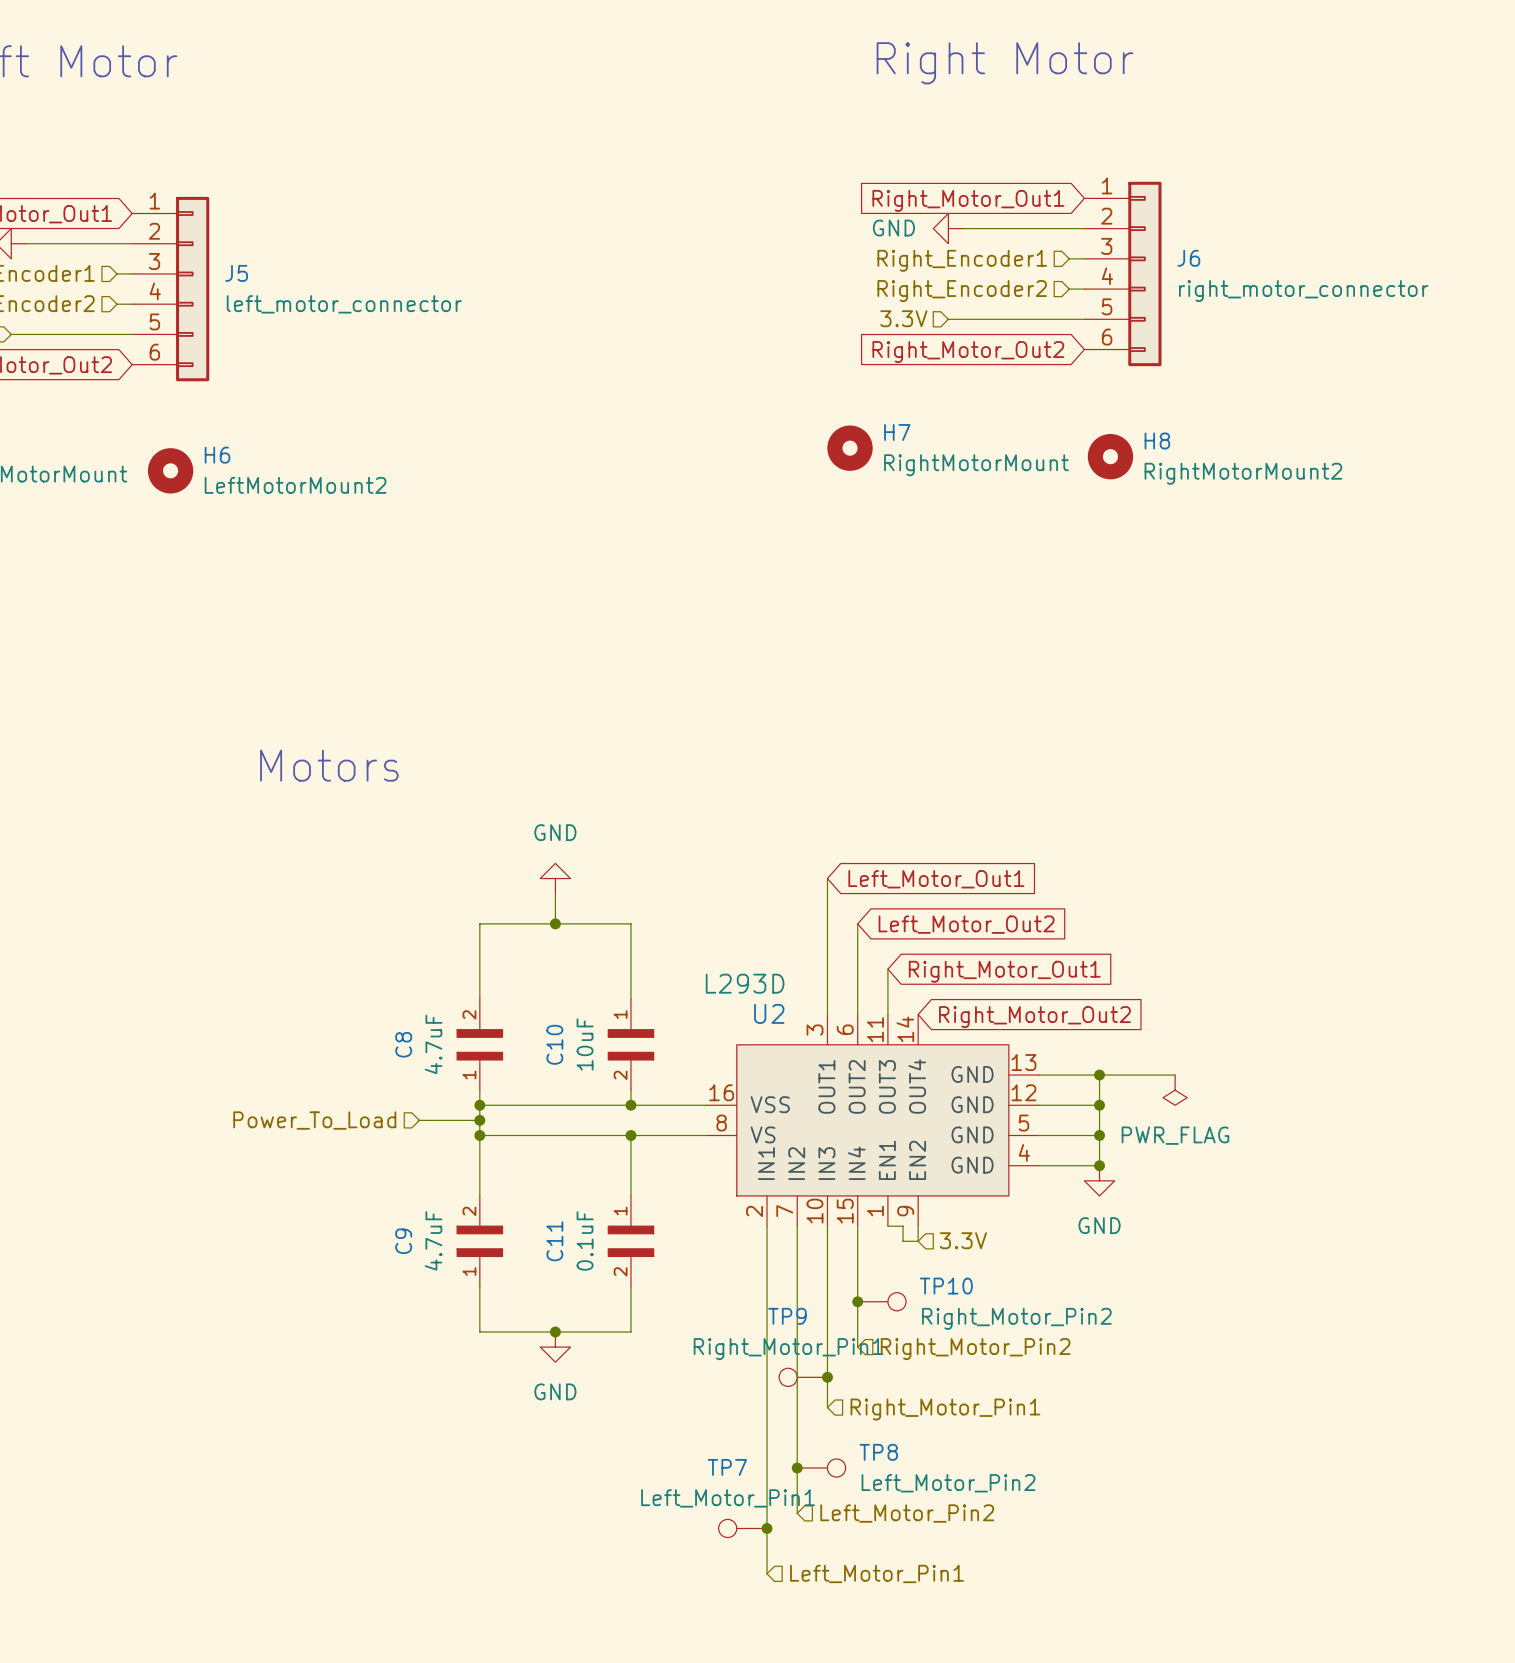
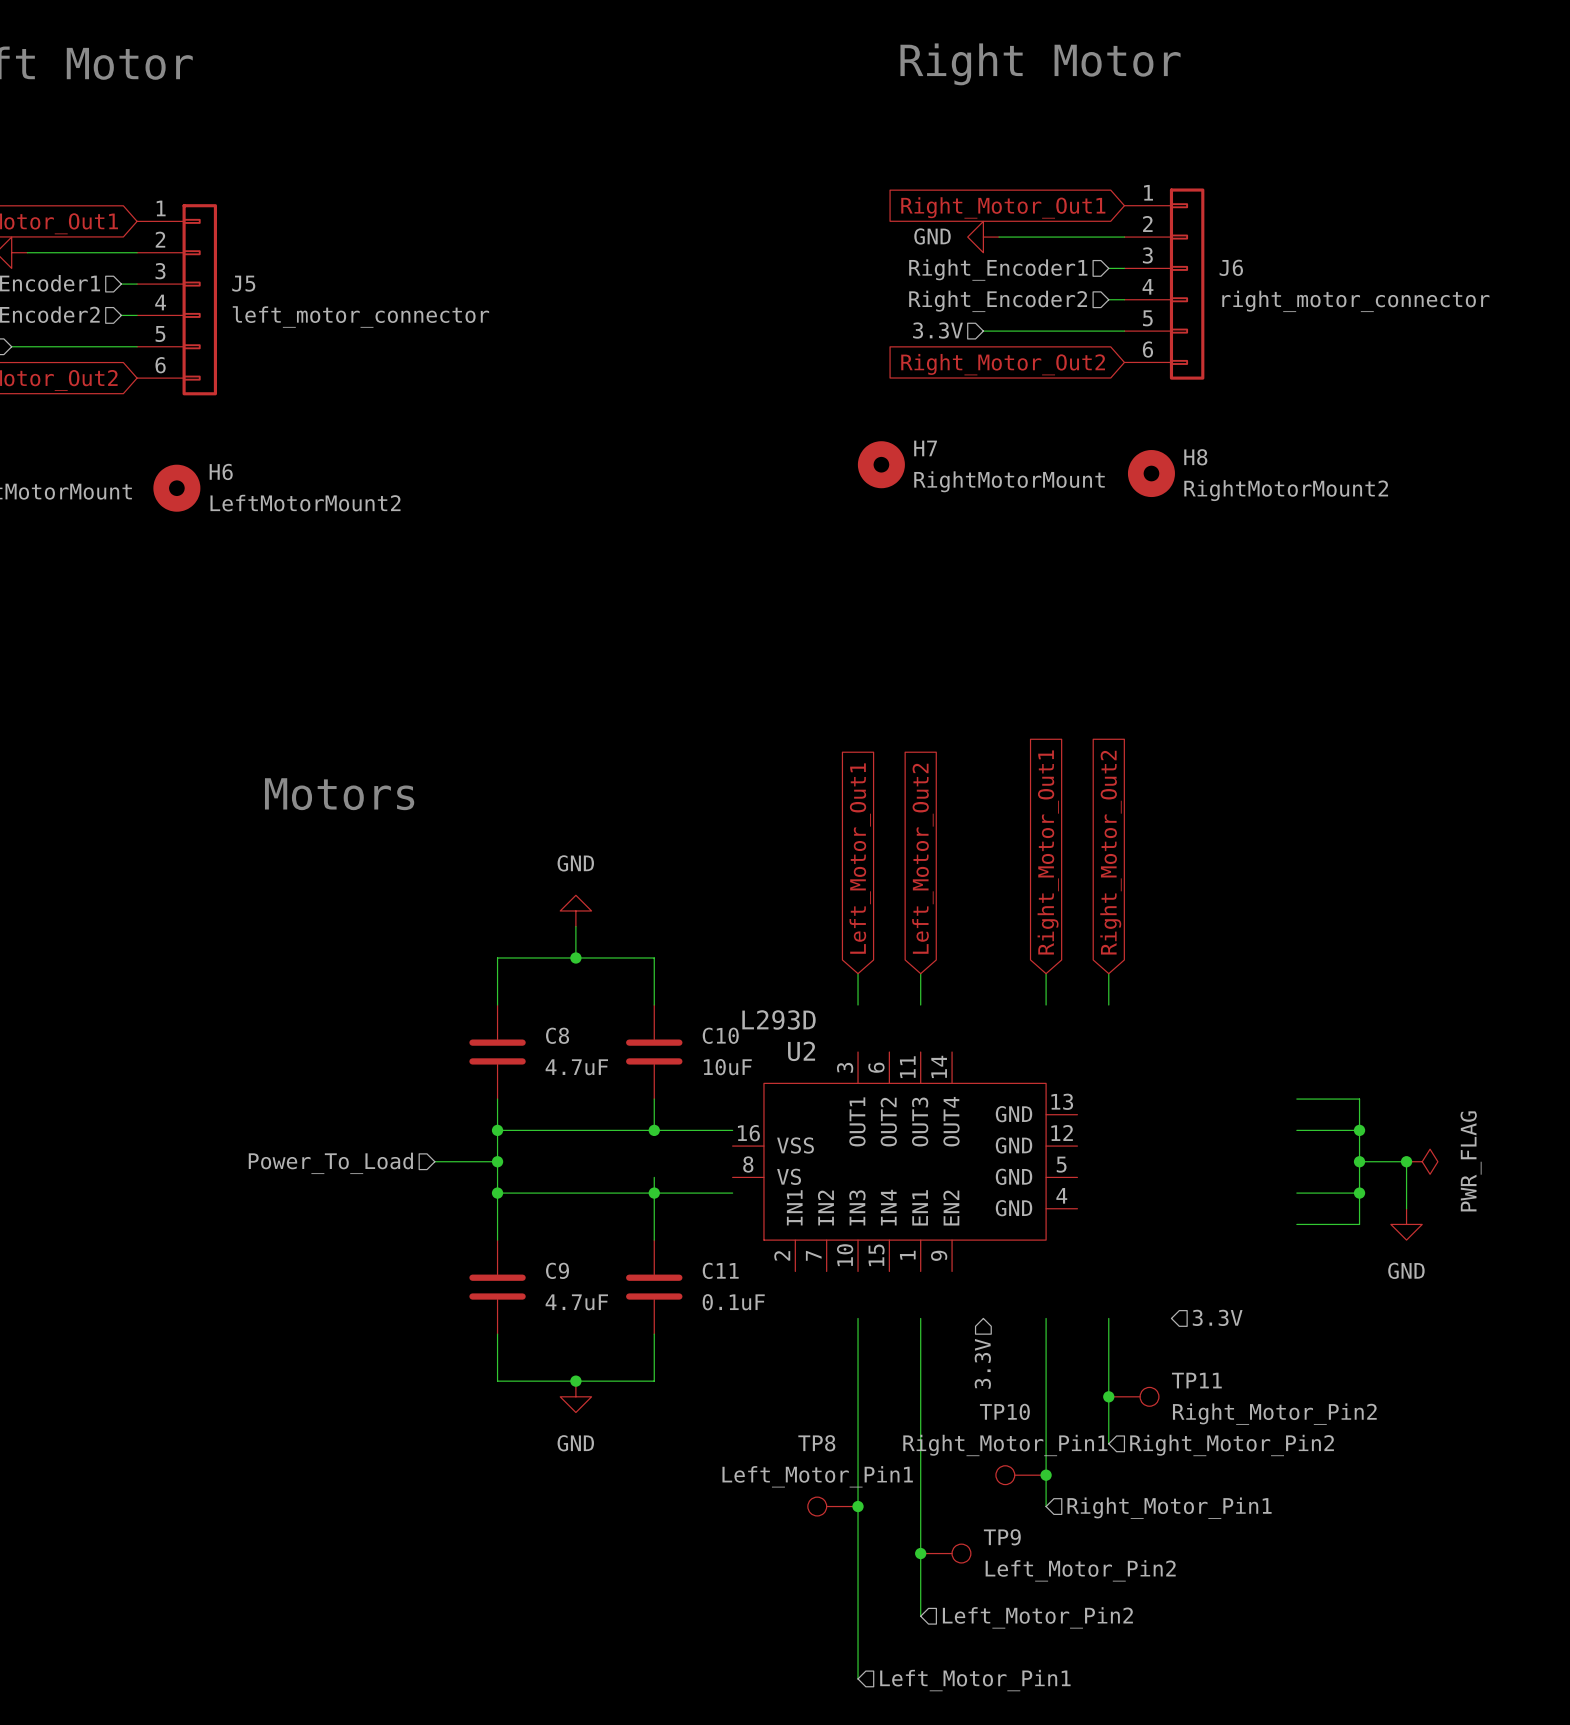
wire: (827, 878) (827, 939) -> none
global label rotation: 0° (936, 879) -> 90° counterclockwise (860, 858)
wire: (857, 923) (857, 1014) -> none
global label rotation: 0° (966, 924) -> 90° counterclockwise (922, 858)
wire: none -> (1046, 973) (1046, 1005)
wire: none -> (1108, 973) (1108, 1005)
wire: (827, 969) (827, 1014) -> none
wire: (887, 969) (887, 1014) -> (920, 1005) (920, 973)
global label rotation: 0° (1004, 971) -> 90° counterclockwise (1048, 852)
C8 symbol: [456, 999, 504, 1091] -> [469, 1005, 526, 1100]
C10 symbol: [607, 999, 655, 1091] -> [626, 1005, 683, 1100]
global label rotation: 0° (1034, 1017) -> 90° counterclockwise (1110, 852)
C8 name position: C8 (403, 1044) -> C8 (557, 1035)
C8 value position: 4.7uF (433, 1044) -> 4.7uF (576, 1067)
C10 name position: C10 (554, 1044) -> C10 (720, 1035)
C10 value position: 10uF (585, 1044) -> 10uF (727, 1067)
wire: none -> (497, 1099) (497, 1130) (732, 1130)
wire: none -> (1296, 1099) (1359, 1099) (1359, 1224) (1296, 1224)
wire: (1039, 1075) (1175, 1075) -> none
wire: (1099, 1075) (1099, 1165) (1039, 1165) -> none
junction: (1099, 1075) -> none
power symbol rotation: 0° (1175, 1090) -> 90° counterclockwise (1422, 1161)
power symbol position: PWR_FLAG (1175, 1090) -> PWR_FLAG (1422, 1161)
junction: none -> (1359, 1130)
wire: (479, 1105) (706, 1105) -> none
junction position: (479, 1105) -> (497, 1130)
junction position: (630, 1105) -> (654, 1130)
wire: (1039, 1105) (1099, 1105) -> (1296, 1193) (1359, 1193)
junction: (1099, 1105) -> none
wire: none -> (1359, 1161) (1406, 1161) (1406, 1208)
junction: none -> (1359, 1161)
junction: none -> (1406, 1161)
wire: (479, 1135) (706, 1135) -> (497, 1193) (732, 1193)
junction position: (479, 1135) -> (497, 1193)
junction position: (630, 1135) -> (654, 1193)
wire: (1039, 1135) (1099, 1135) -> (1296, 1130) (1359, 1130)
junction: (1099, 1135) -> none
junction: none -> (1359, 1193)
junction: (1099, 1165) -> none
power symbol position: GND (1099, 1180) -> GND (1406, 1224)
C9 symbol: [456, 1195, 504, 1287] -> [469, 1240, 526, 1335]
C11 symbol: [607, 1195, 655, 1287] -> [626, 1240, 683, 1335]
wire: (767, 1226) (767, 1573) -> none
wire: (797, 1226) (797, 1513) -> (920, 1318) (920, 1616)
wire: (827, 1226) (827, 1271) -> none
wire: (857, 1226) (857, 1347) -> (1108, 1318) (1108, 1443)
wire: (887, 1226) (903, 1226) (903, 1241) (918, 1241) (918, 1226) -> none
C9 value position: 4.7uF (433, 1240) -> 4.7uF (576, 1302)
C11 value position: 0.1uF (585, 1240) -> 0.1uF (733, 1302)
hierarchical label rotation: 0° (963, 1240) -> 90° clockwise (982, 1363)
hierarchical label position: 3.3V (963, 1240) -> 3.3V (982, 1363)
C9 name position: C9 (403, 1241) -> C9 (557, 1270)
C11 name position: C11 (554, 1241) -> C11 (720, 1270)
hierarchical label: none -> 3.3V (1217, 1317)
wire: none -> (1046, 1318) (1046, 1506)
TP10 name position: TP10 (946, 1286) -> TP10 (1004, 1411)
junction: (857, 1301) -> none
TP10 position: (881, 1301) -> (1021, 1475)
TP10 rotation: 0° (897, 1301) -> 180° (1005, 1475)
TP9 name position: TP9 (787, 1316) -> TP9 (1002, 1537)
TP10 value: Right_Motor_Pin2 (1016, 1318) -> Right_Motor_Pin1 (1005, 1445)
junction: none -> (1108, 1396)
TP11: none -> Right_Motor_Pin2 (1133, 1396)
TP9 value: Right_Motor_Pin1 (788, 1349) -> Left_Motor_Pin2 (1080, 1570)
hierarchical label position: Right_Motor_Pin2 (975, 1349) -> Right_Motor_Pin2 (1232, 1445)
TP9 rotation: 0° (788, 1377) -> 180° (961, 1553)
TP9 position: (803, 1377) -> (945, 1553)
junction: (827, 1377) -> none
wire: none -> (858, 1459) (858, 1678)
hierarchical label position: Right_Motor_Pin1 (945, 1409) -> Right_Motor_Pin1 (1169, 1508)
junction: none -> (1046, 1475)
TP8 name position: TP8 (878, 1452) -> TP8 (816, 1443)
junction position: (797, 1468) -> (858, 1506)
TP8 rotation: 0° (836, 1468) -> 180° (817, 1506)
TP8 value: Left_Motor_Pin2 (948, 1483) -> Left_Motor_Pin1 (817, 1476)
junction: none -> (920, 1553)
hierarchical label position: Left_Motor_Pin2 (907, 1513) -> Left_Motor_Pin2 (1037, 1617)
TP7: Left_Motor_Pin1 (742, 1528) -> none
junction: (767, 1528) -> none
hierarchical label position: Left_Motor_Pin1 (877, 1573) -> Left_Motor_Pin1 (975, 1680)

